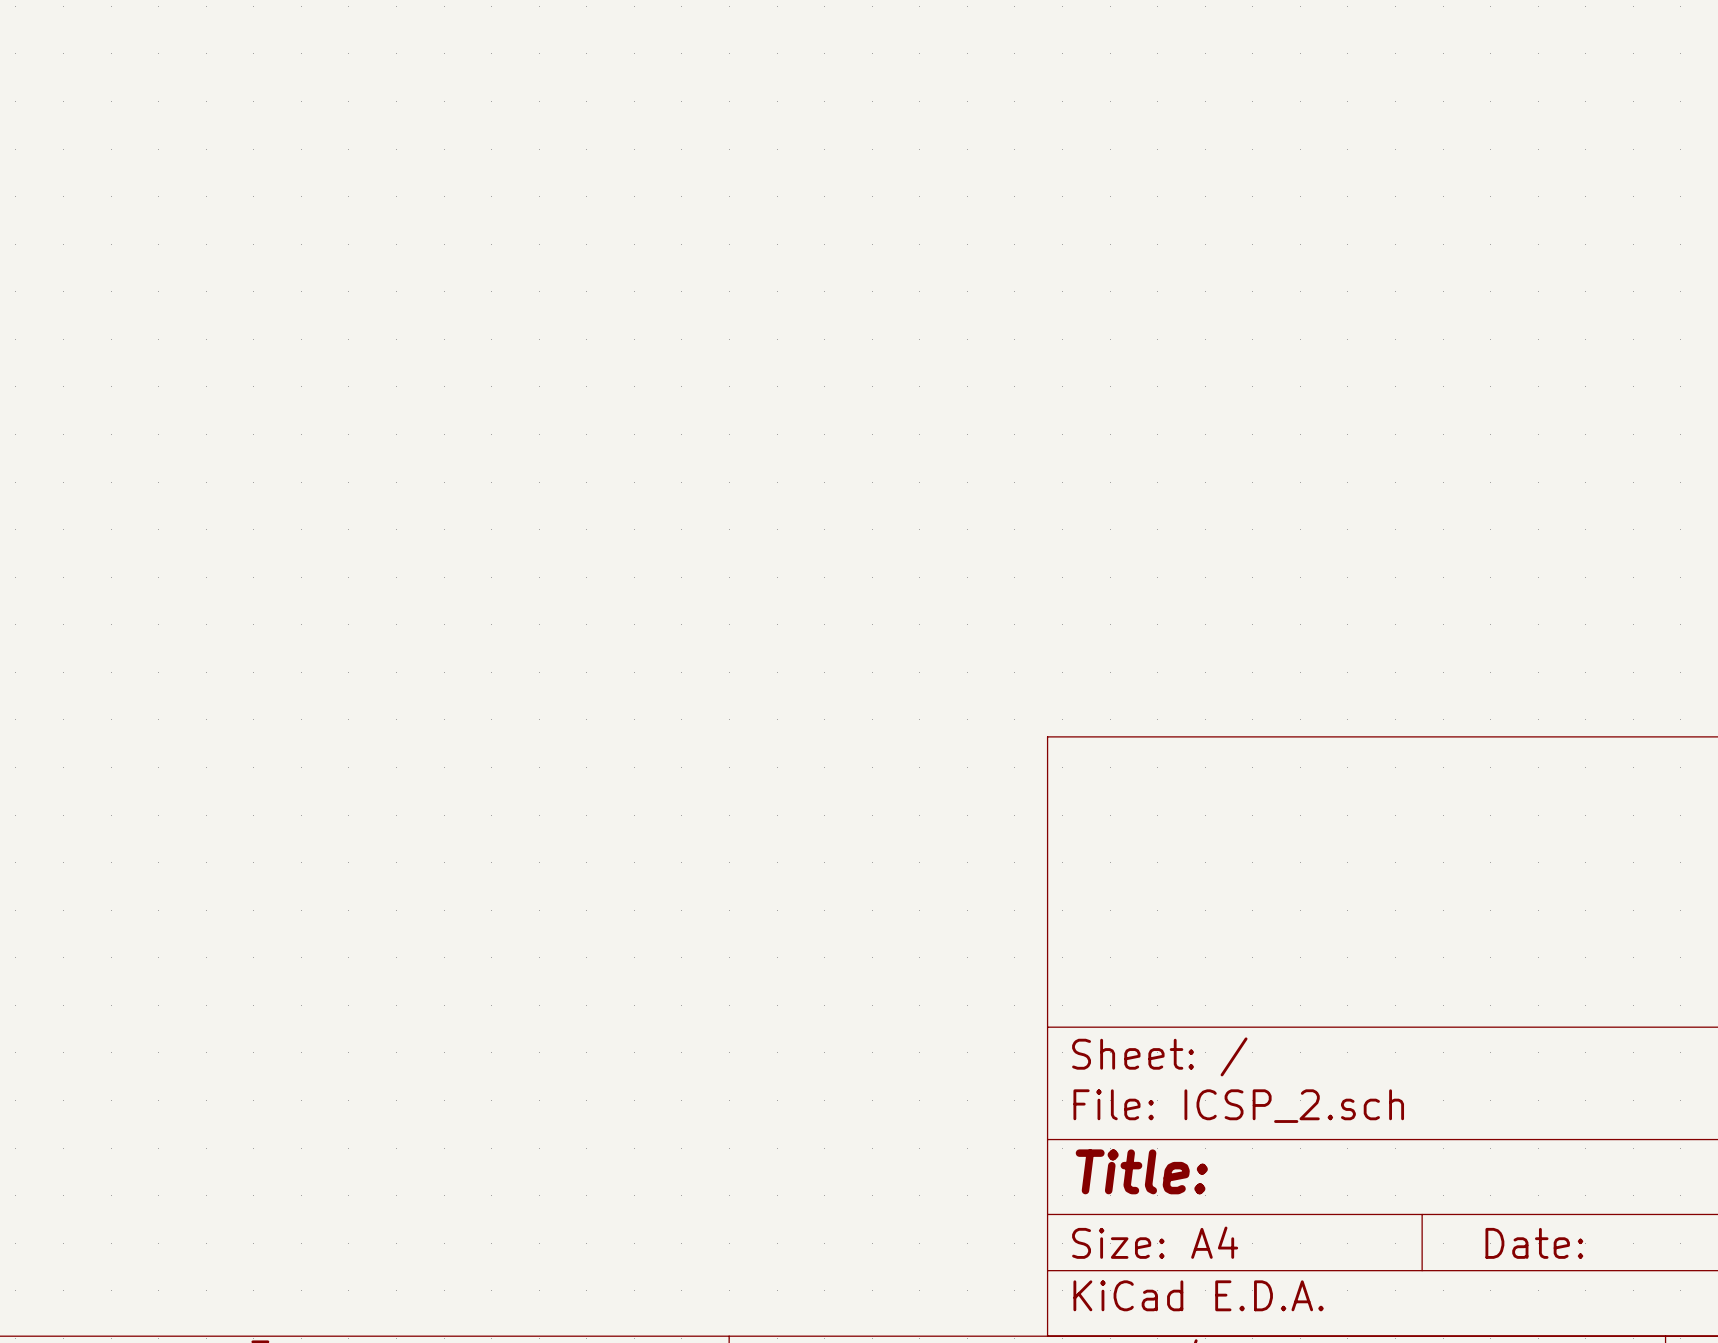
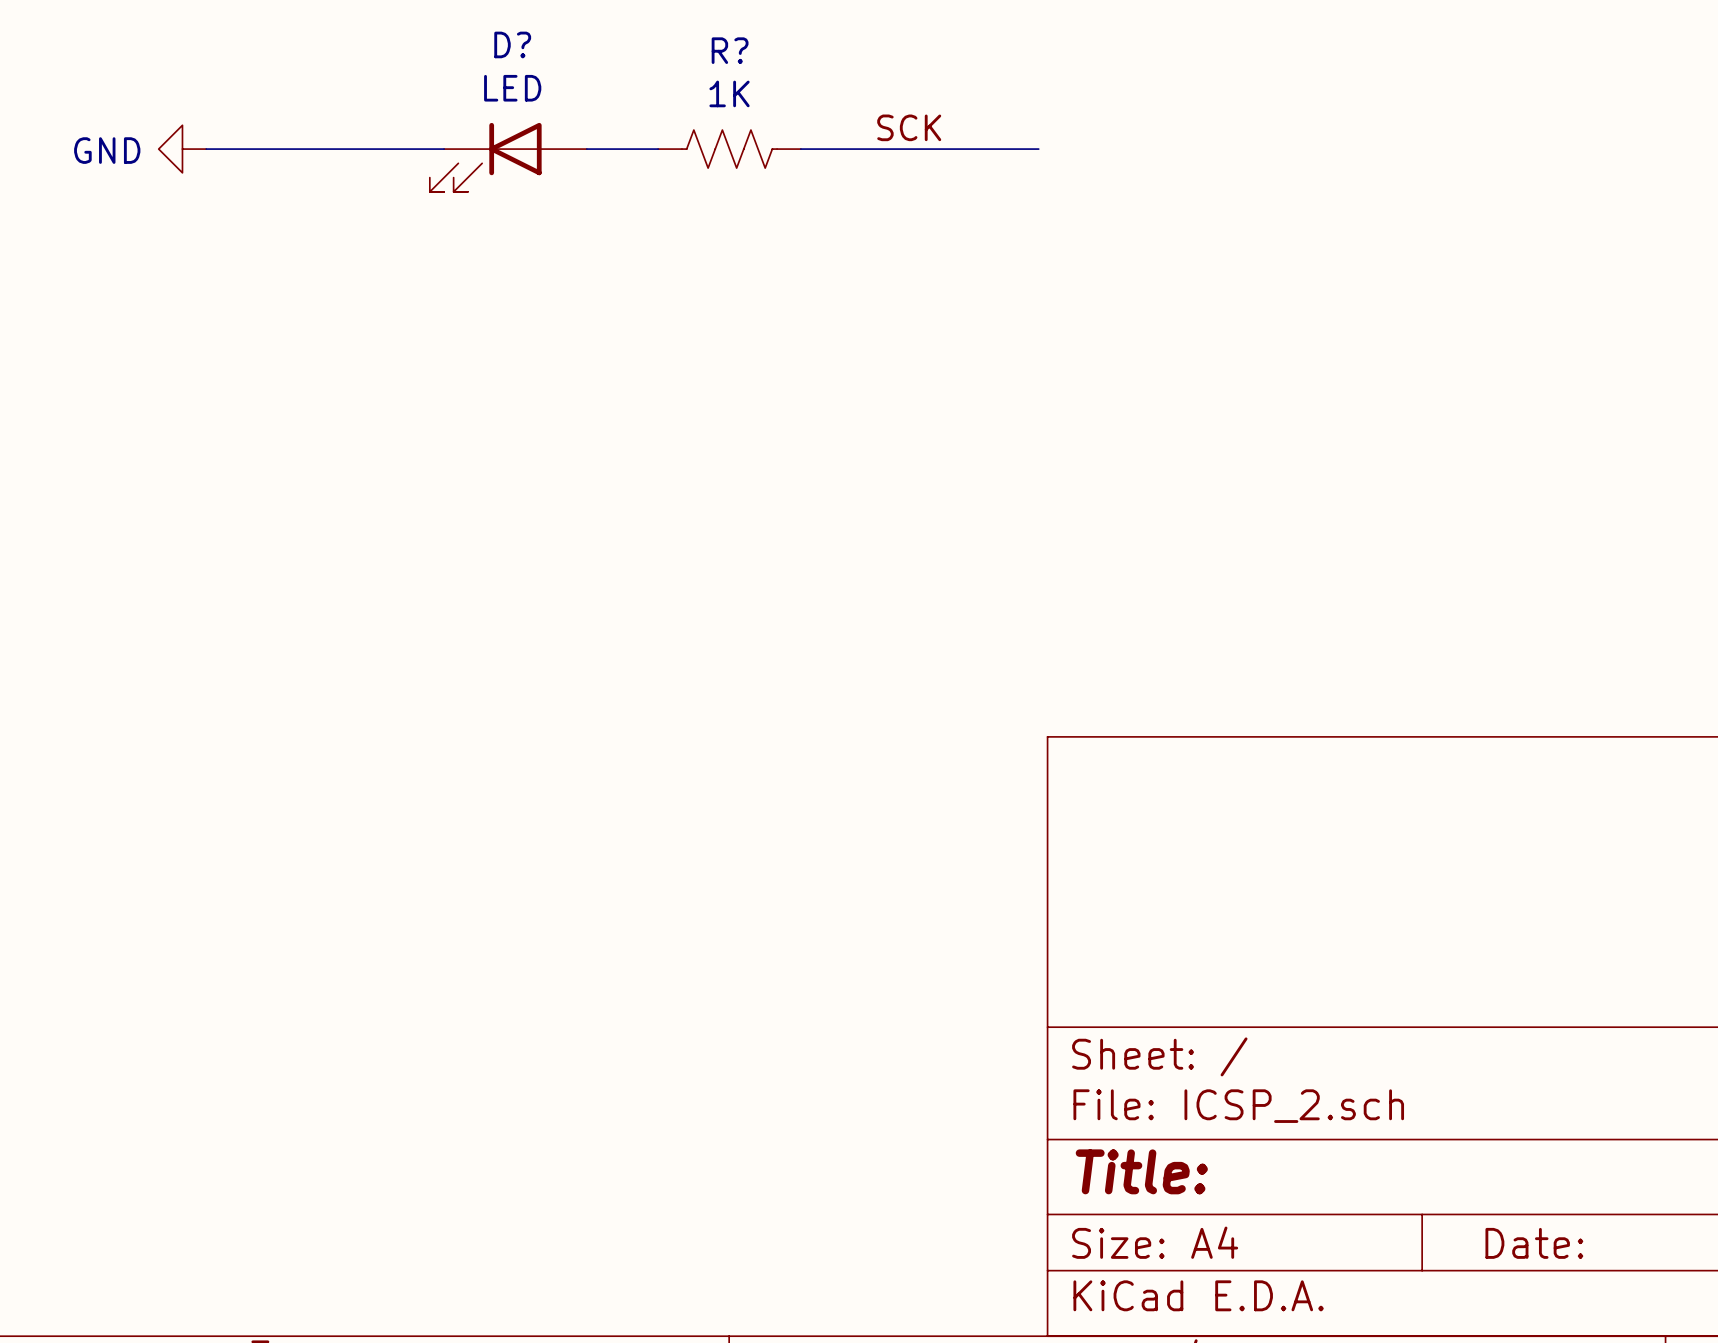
label: none -> SCK (909, 127)
power symbol: none -> GND (182, 149)
wire: none -> (206, 149) (444, 149)
wire: none -> (586, 149) (658, 149)
R?: none -> 1K (729, 149)
wire: none -> (800, 149) (1038, 149)
D?: none -> LED (508, 157)

